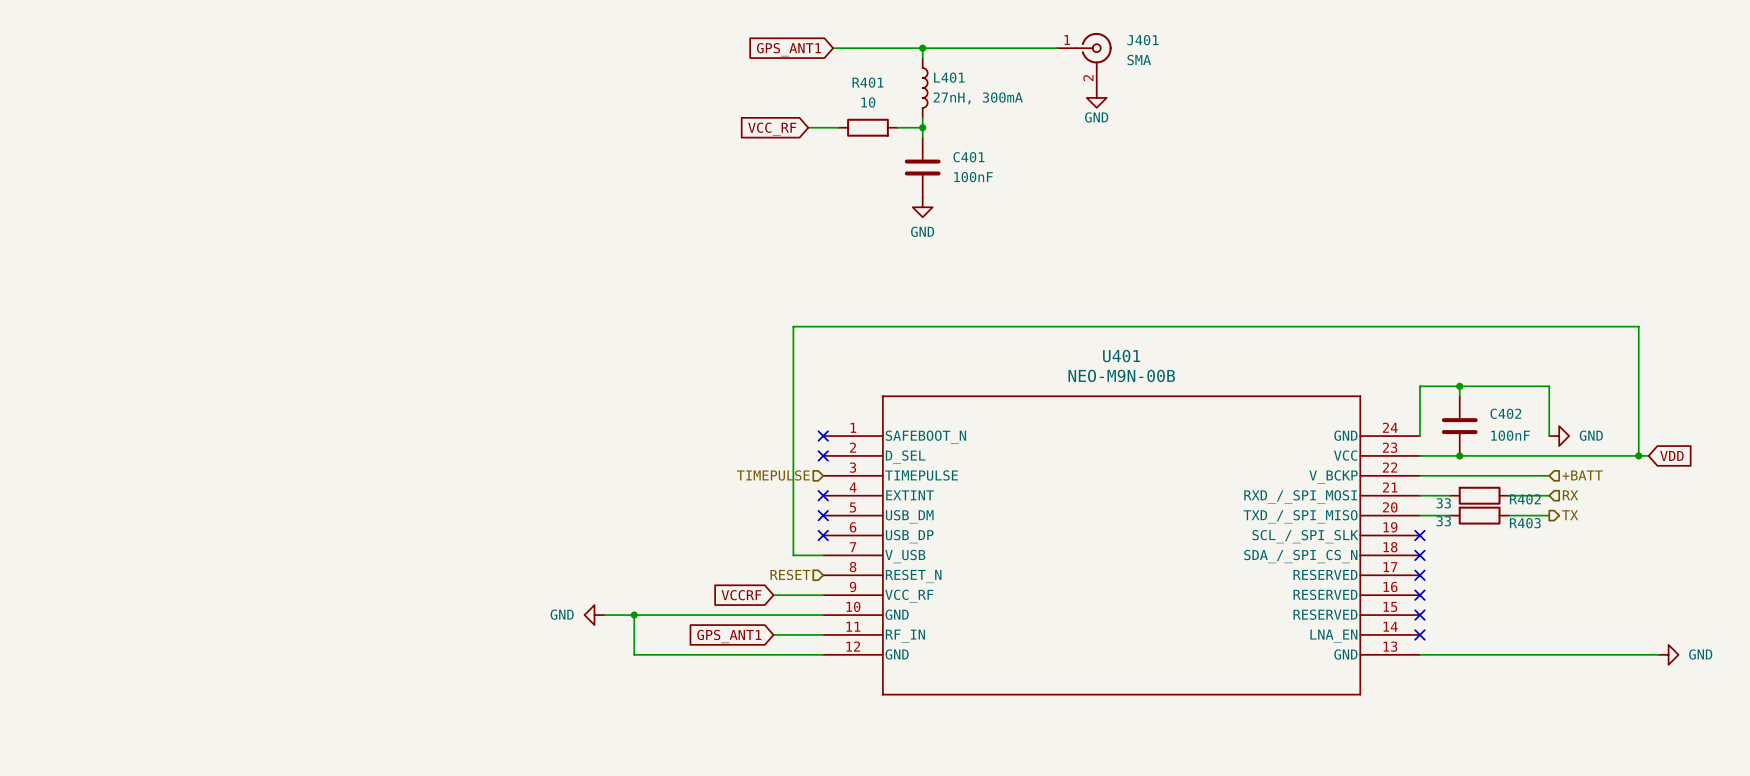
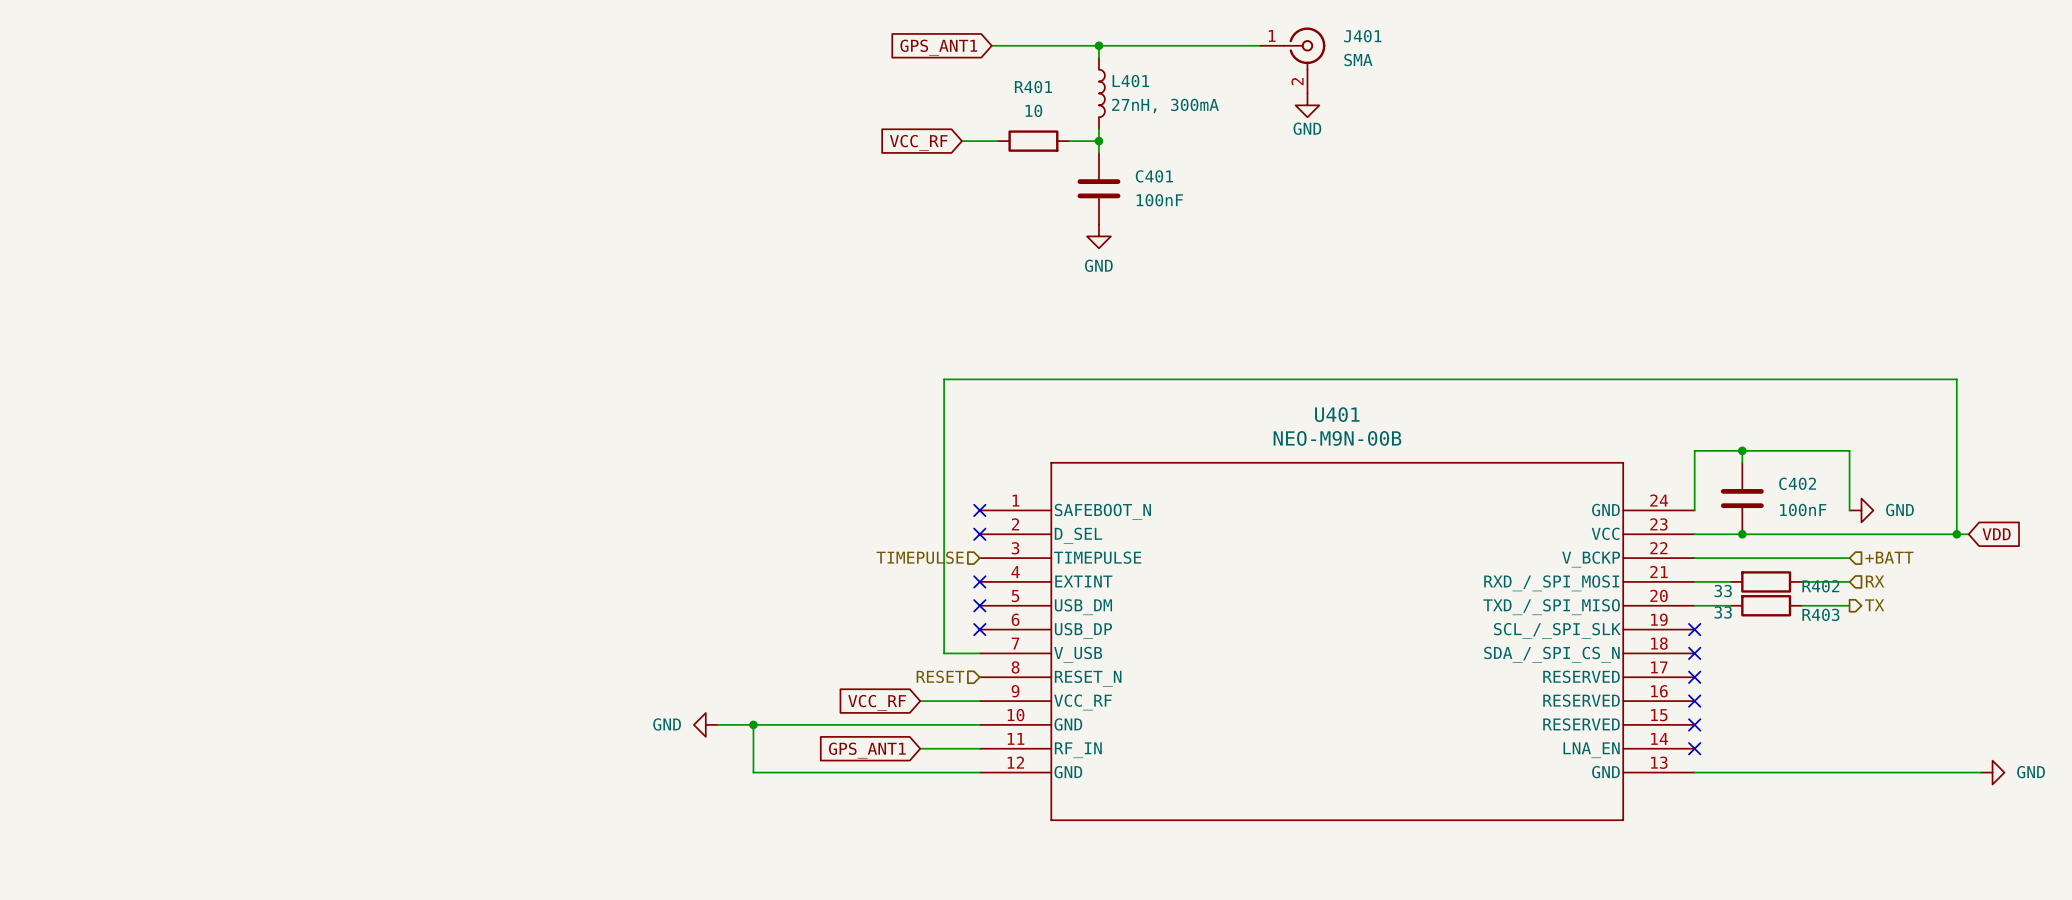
global label: VCCRF (741, 595) -> VCC_RF (877, 702)

